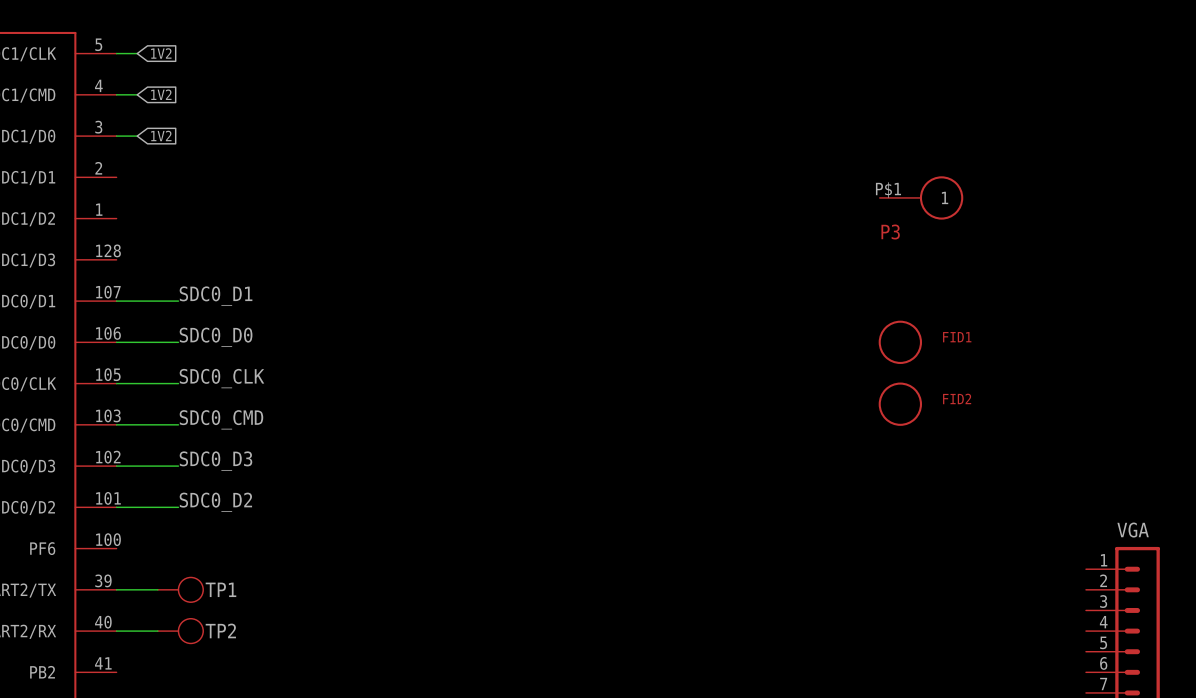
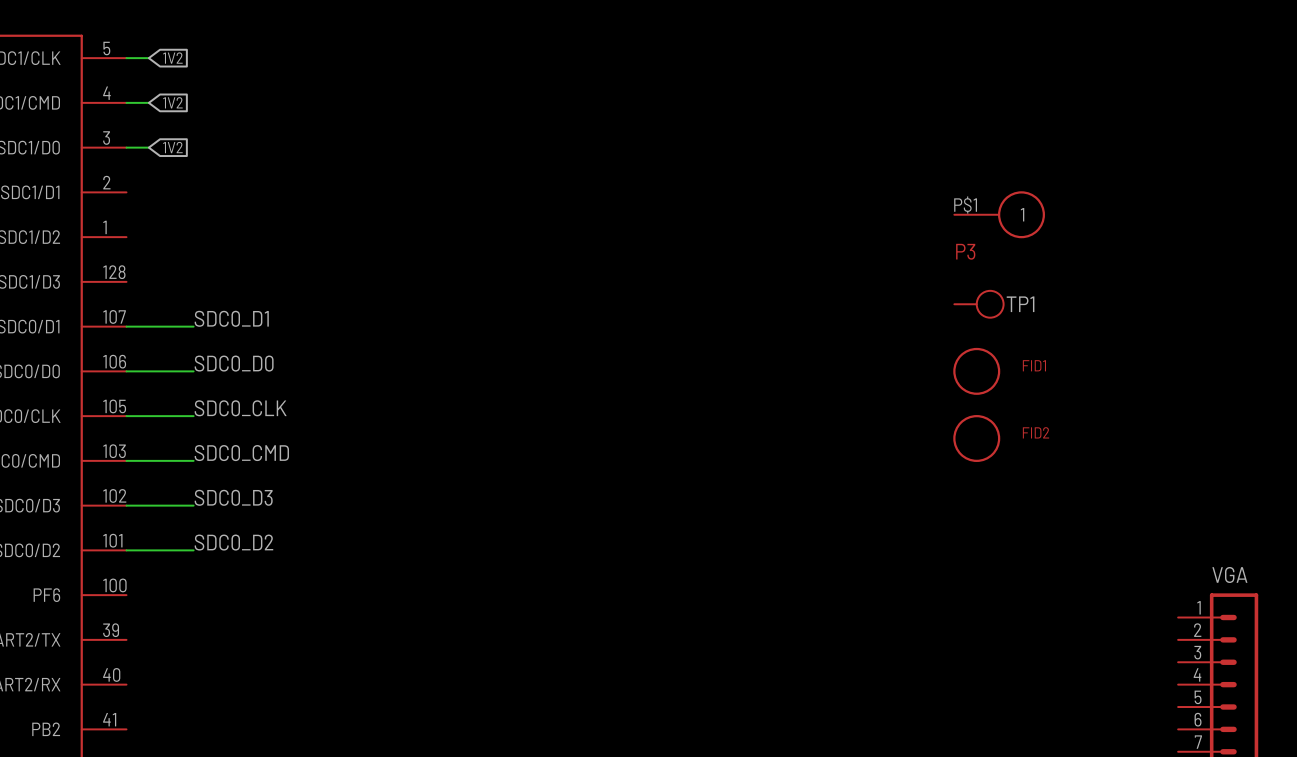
wire: (116, 589) (157, 589) -> none
TP1 position: (180, 589) -> (979, 304)
wire: (116, 631) (157, 631) -> none
TP2: (180, 631) -> none

